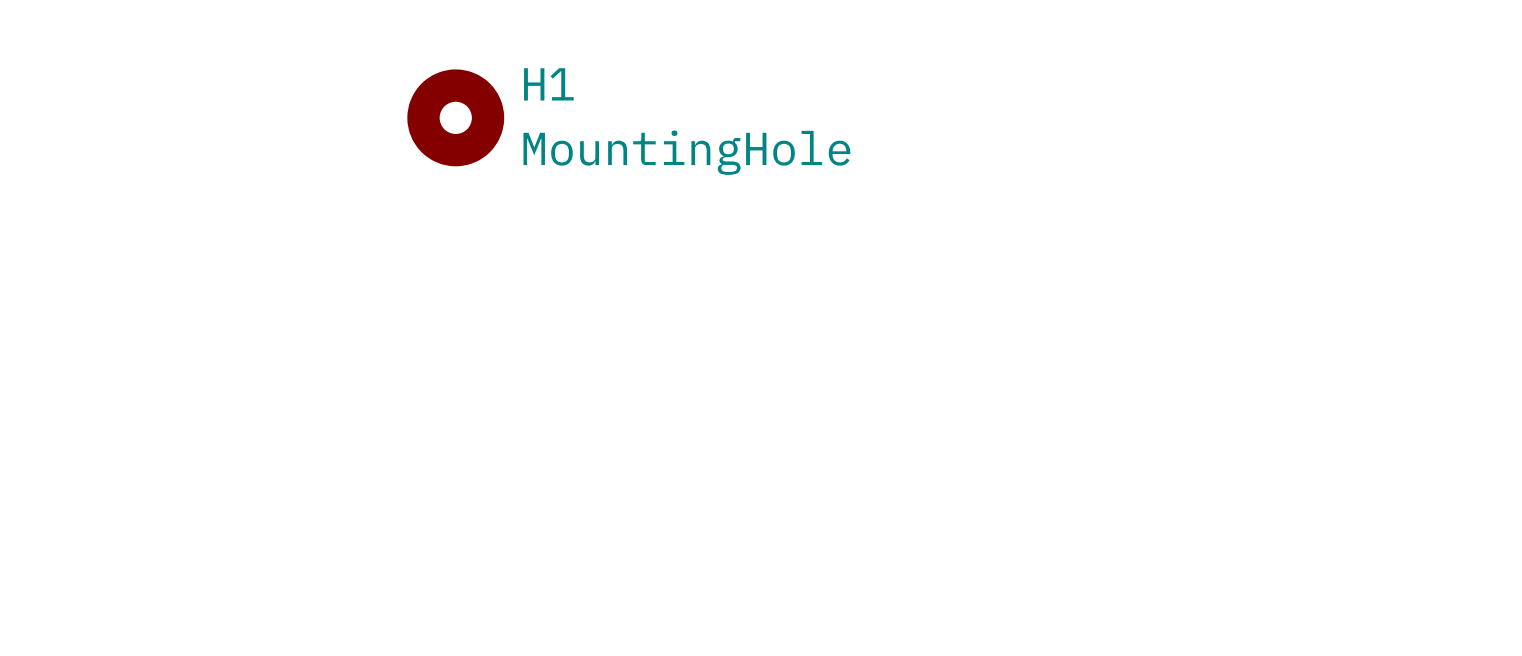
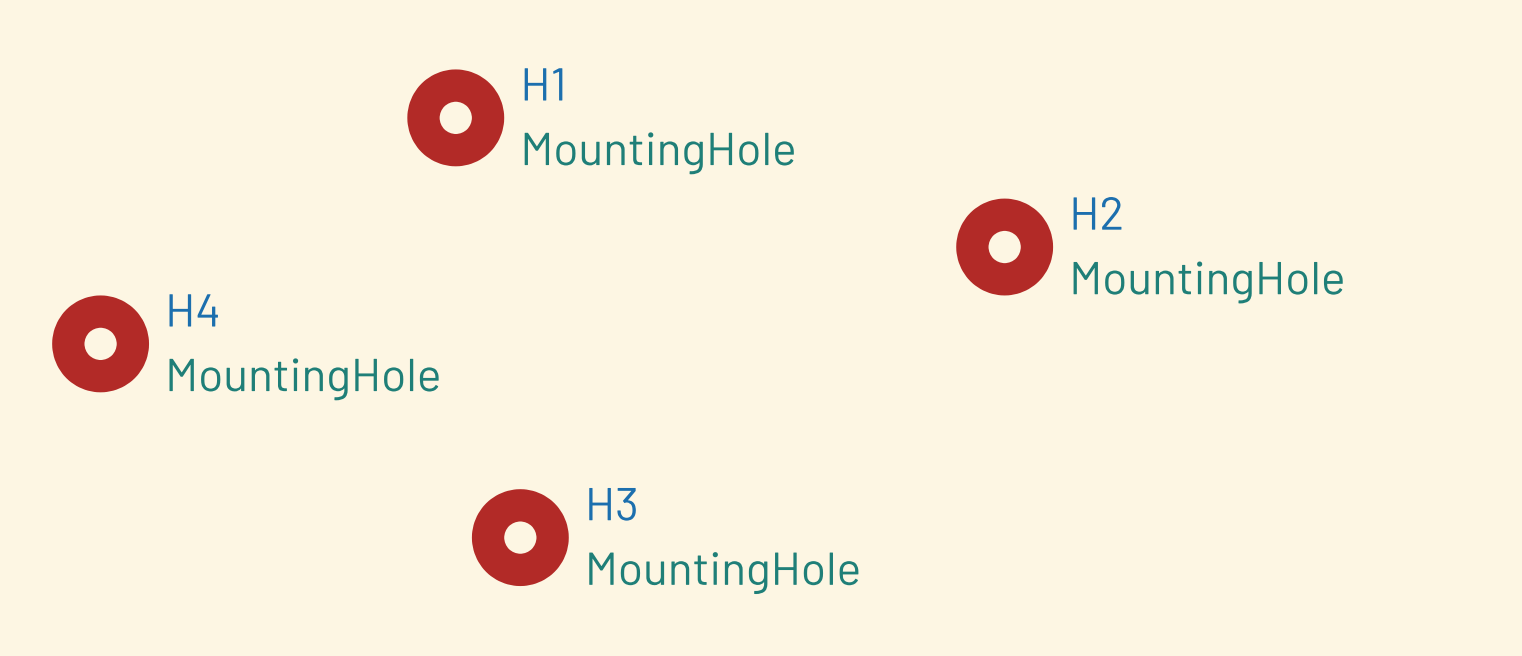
H2: none -> MountingHole (1004, 247)
H4: none -> MountingHole (100, 343)
H3: none -> MountingHole (520, 537)

